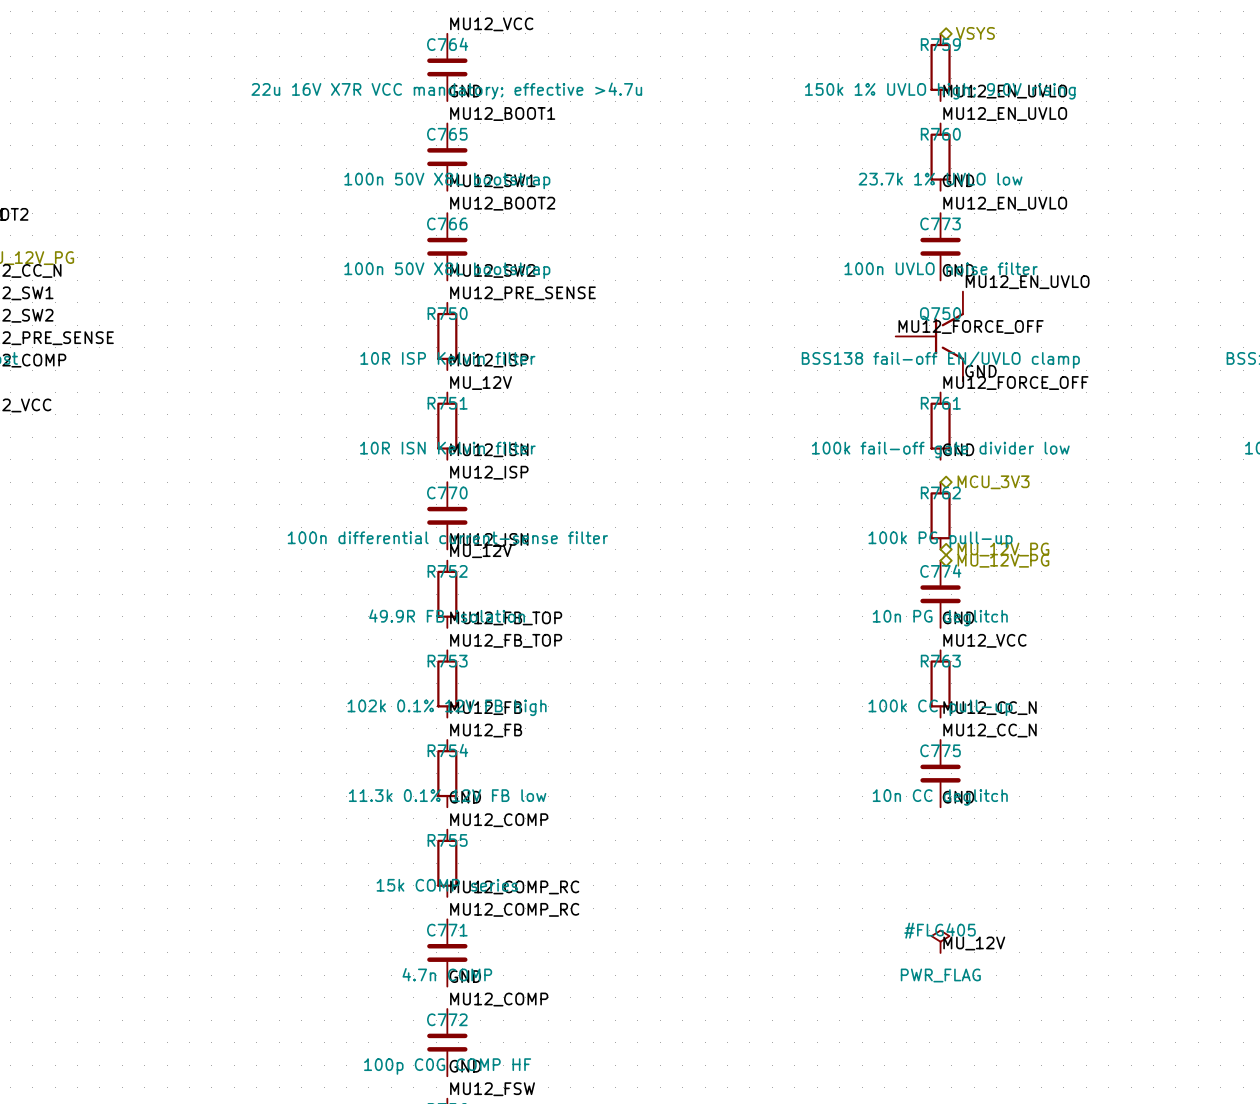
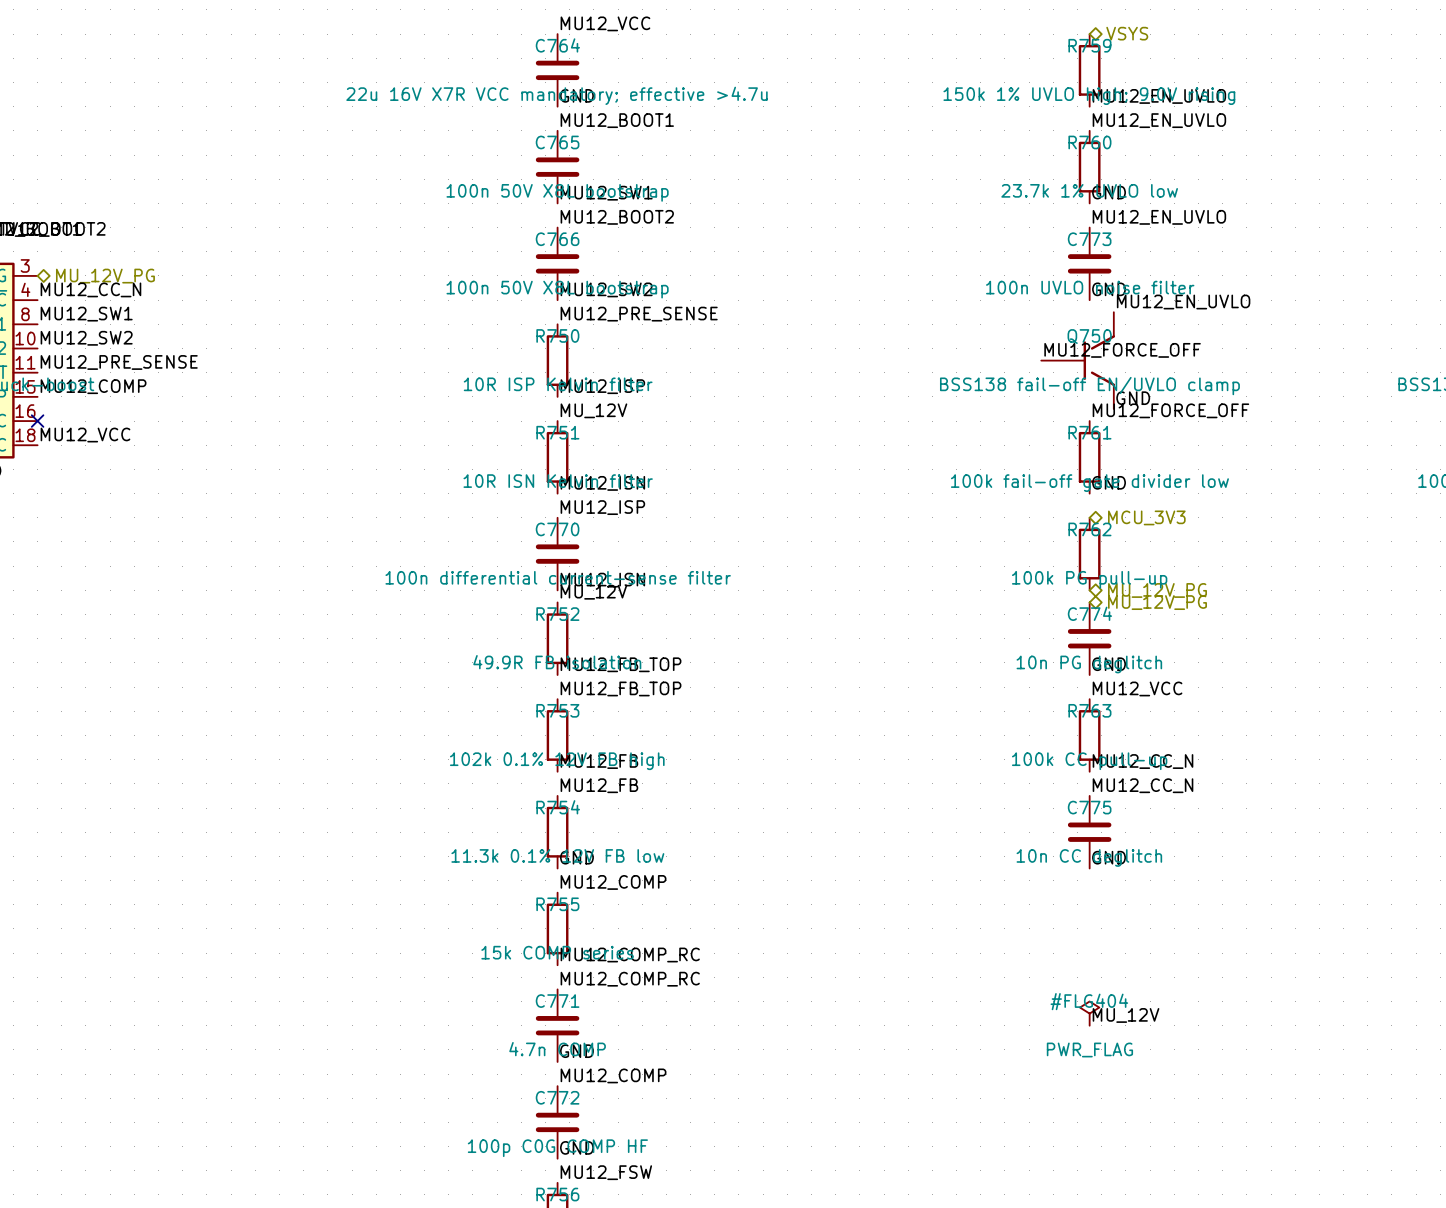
#FLG405 name: #FLG405 (940, 930) -> #FLG404 (1089, 1001)

